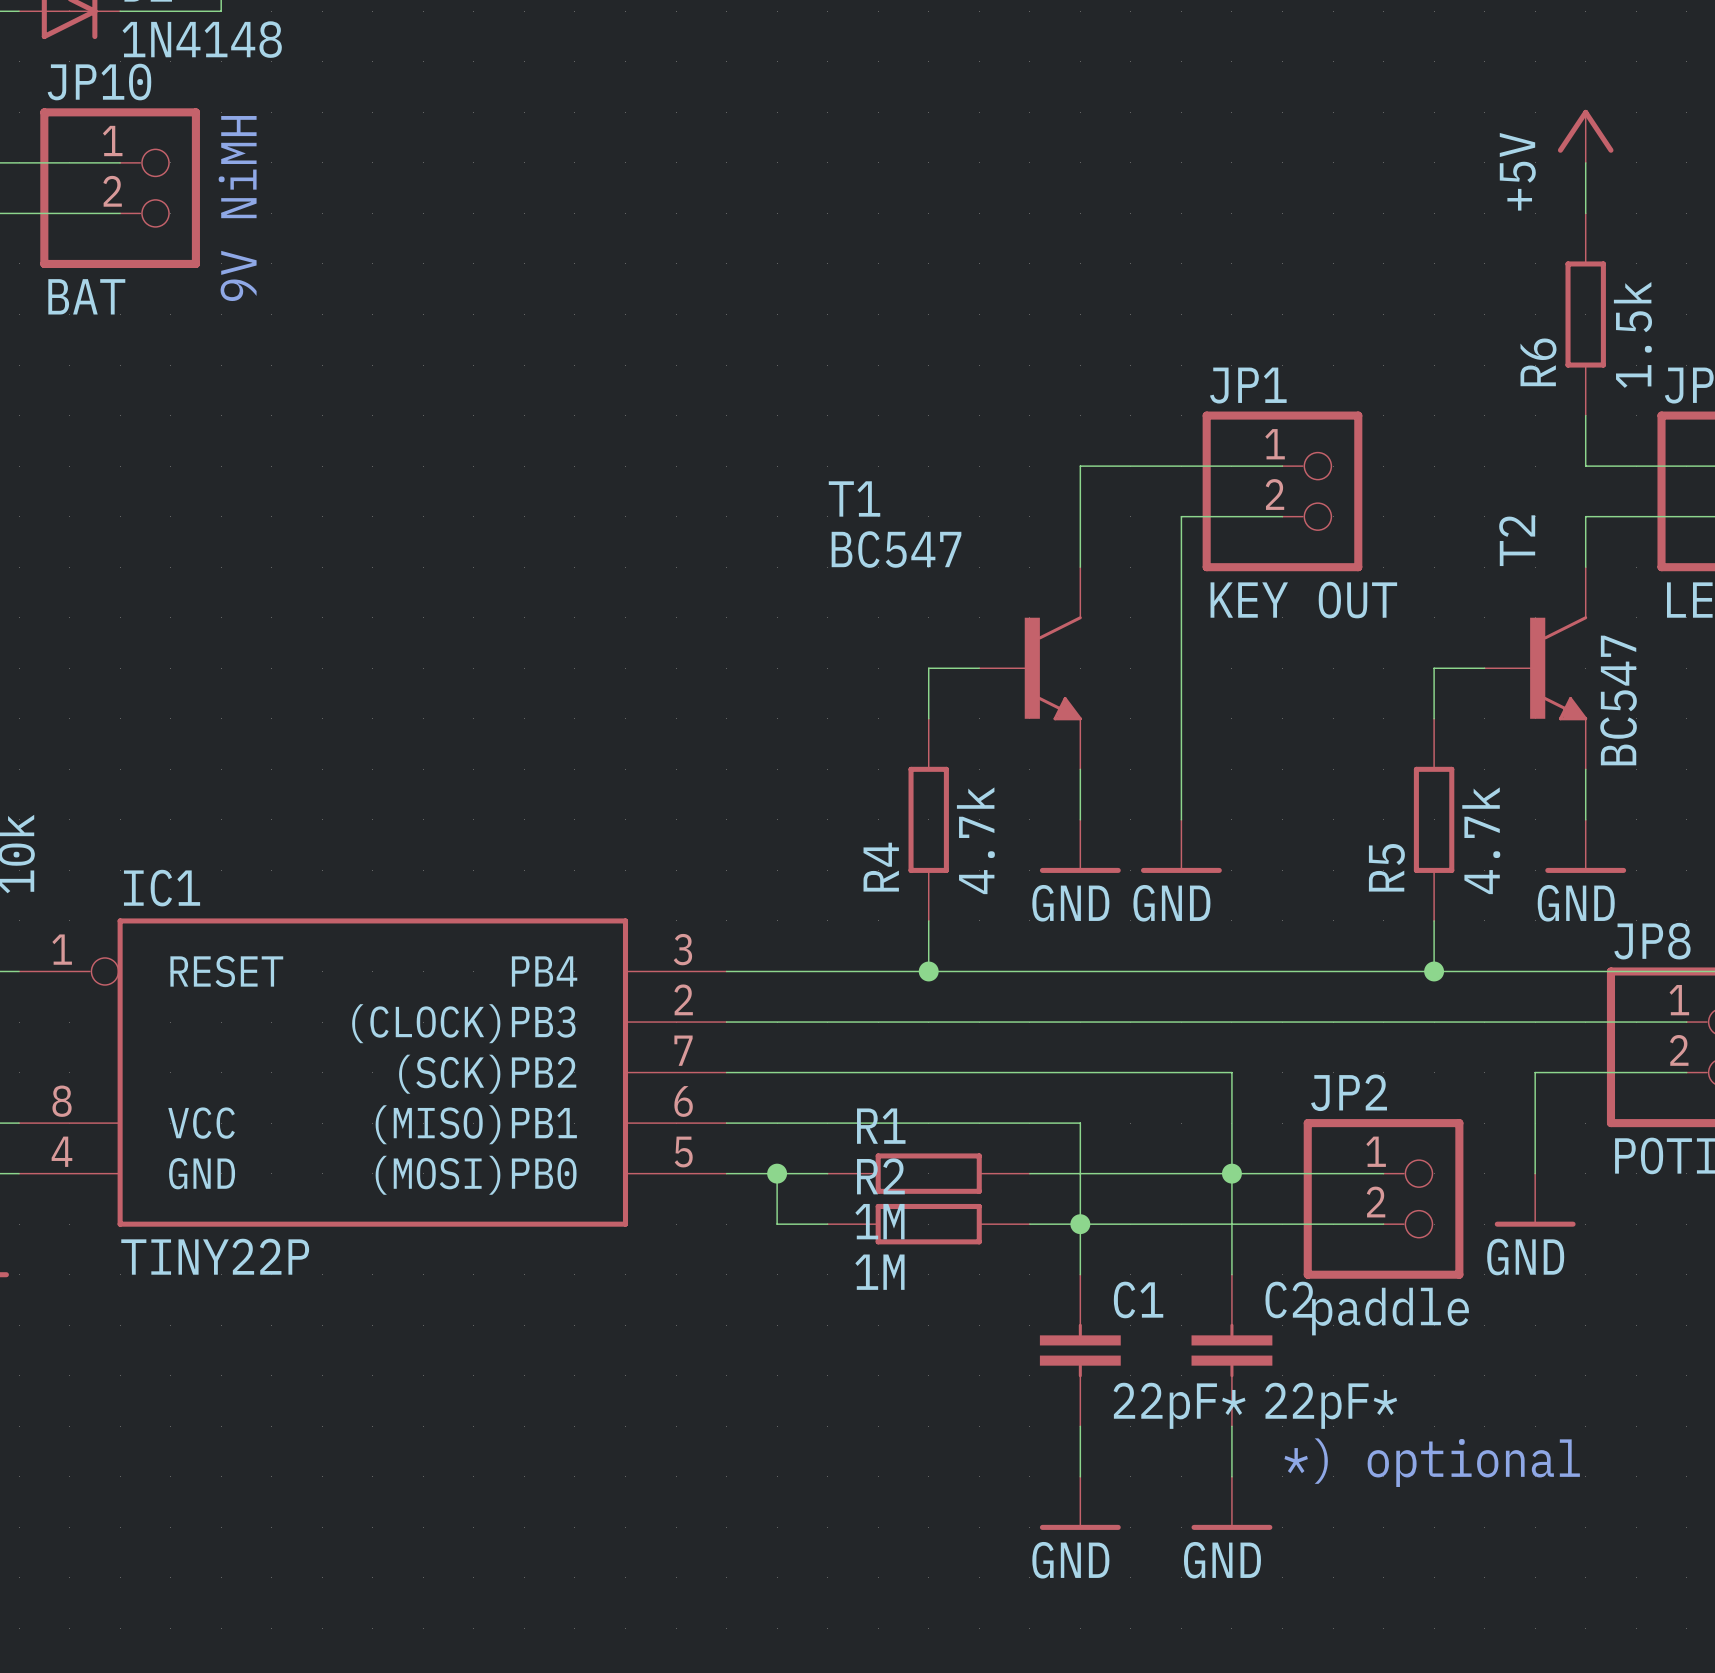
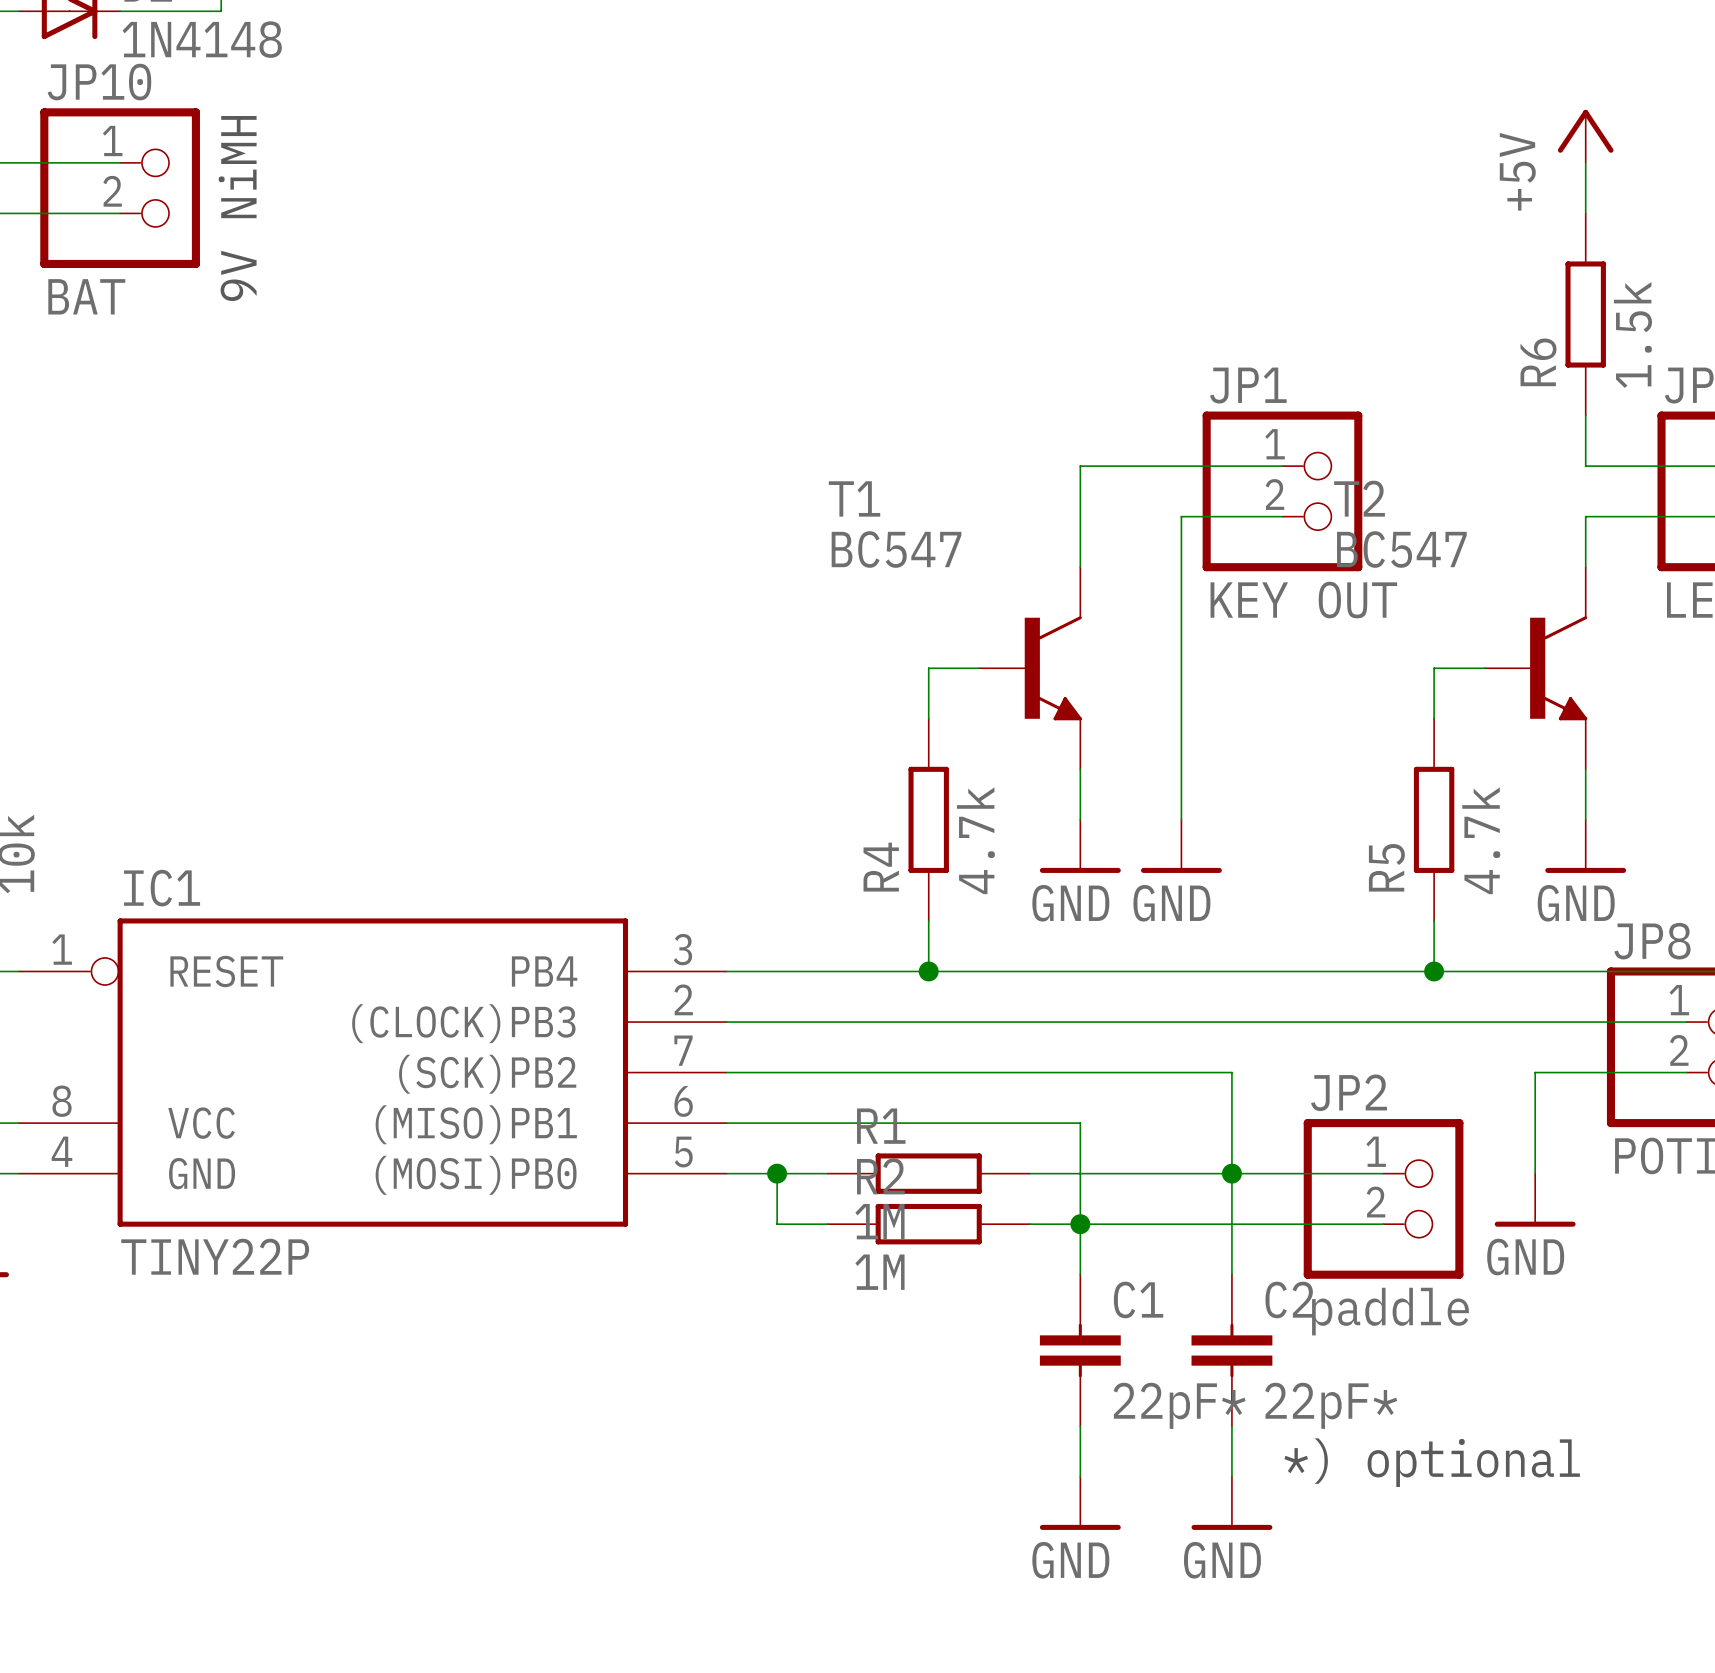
T2 name rotation: 0° (1517, 540) -> 90° clockwise (1359, 498)
T2 name position: T2 (1517, 540) -> T2 (1359, 498)
T2 value rotation: 0° (1618, 700) -> 90° clockwise (1401, 549)
T2 value position: BC547 (1618, 700) -> BC547 (1401, 549)

